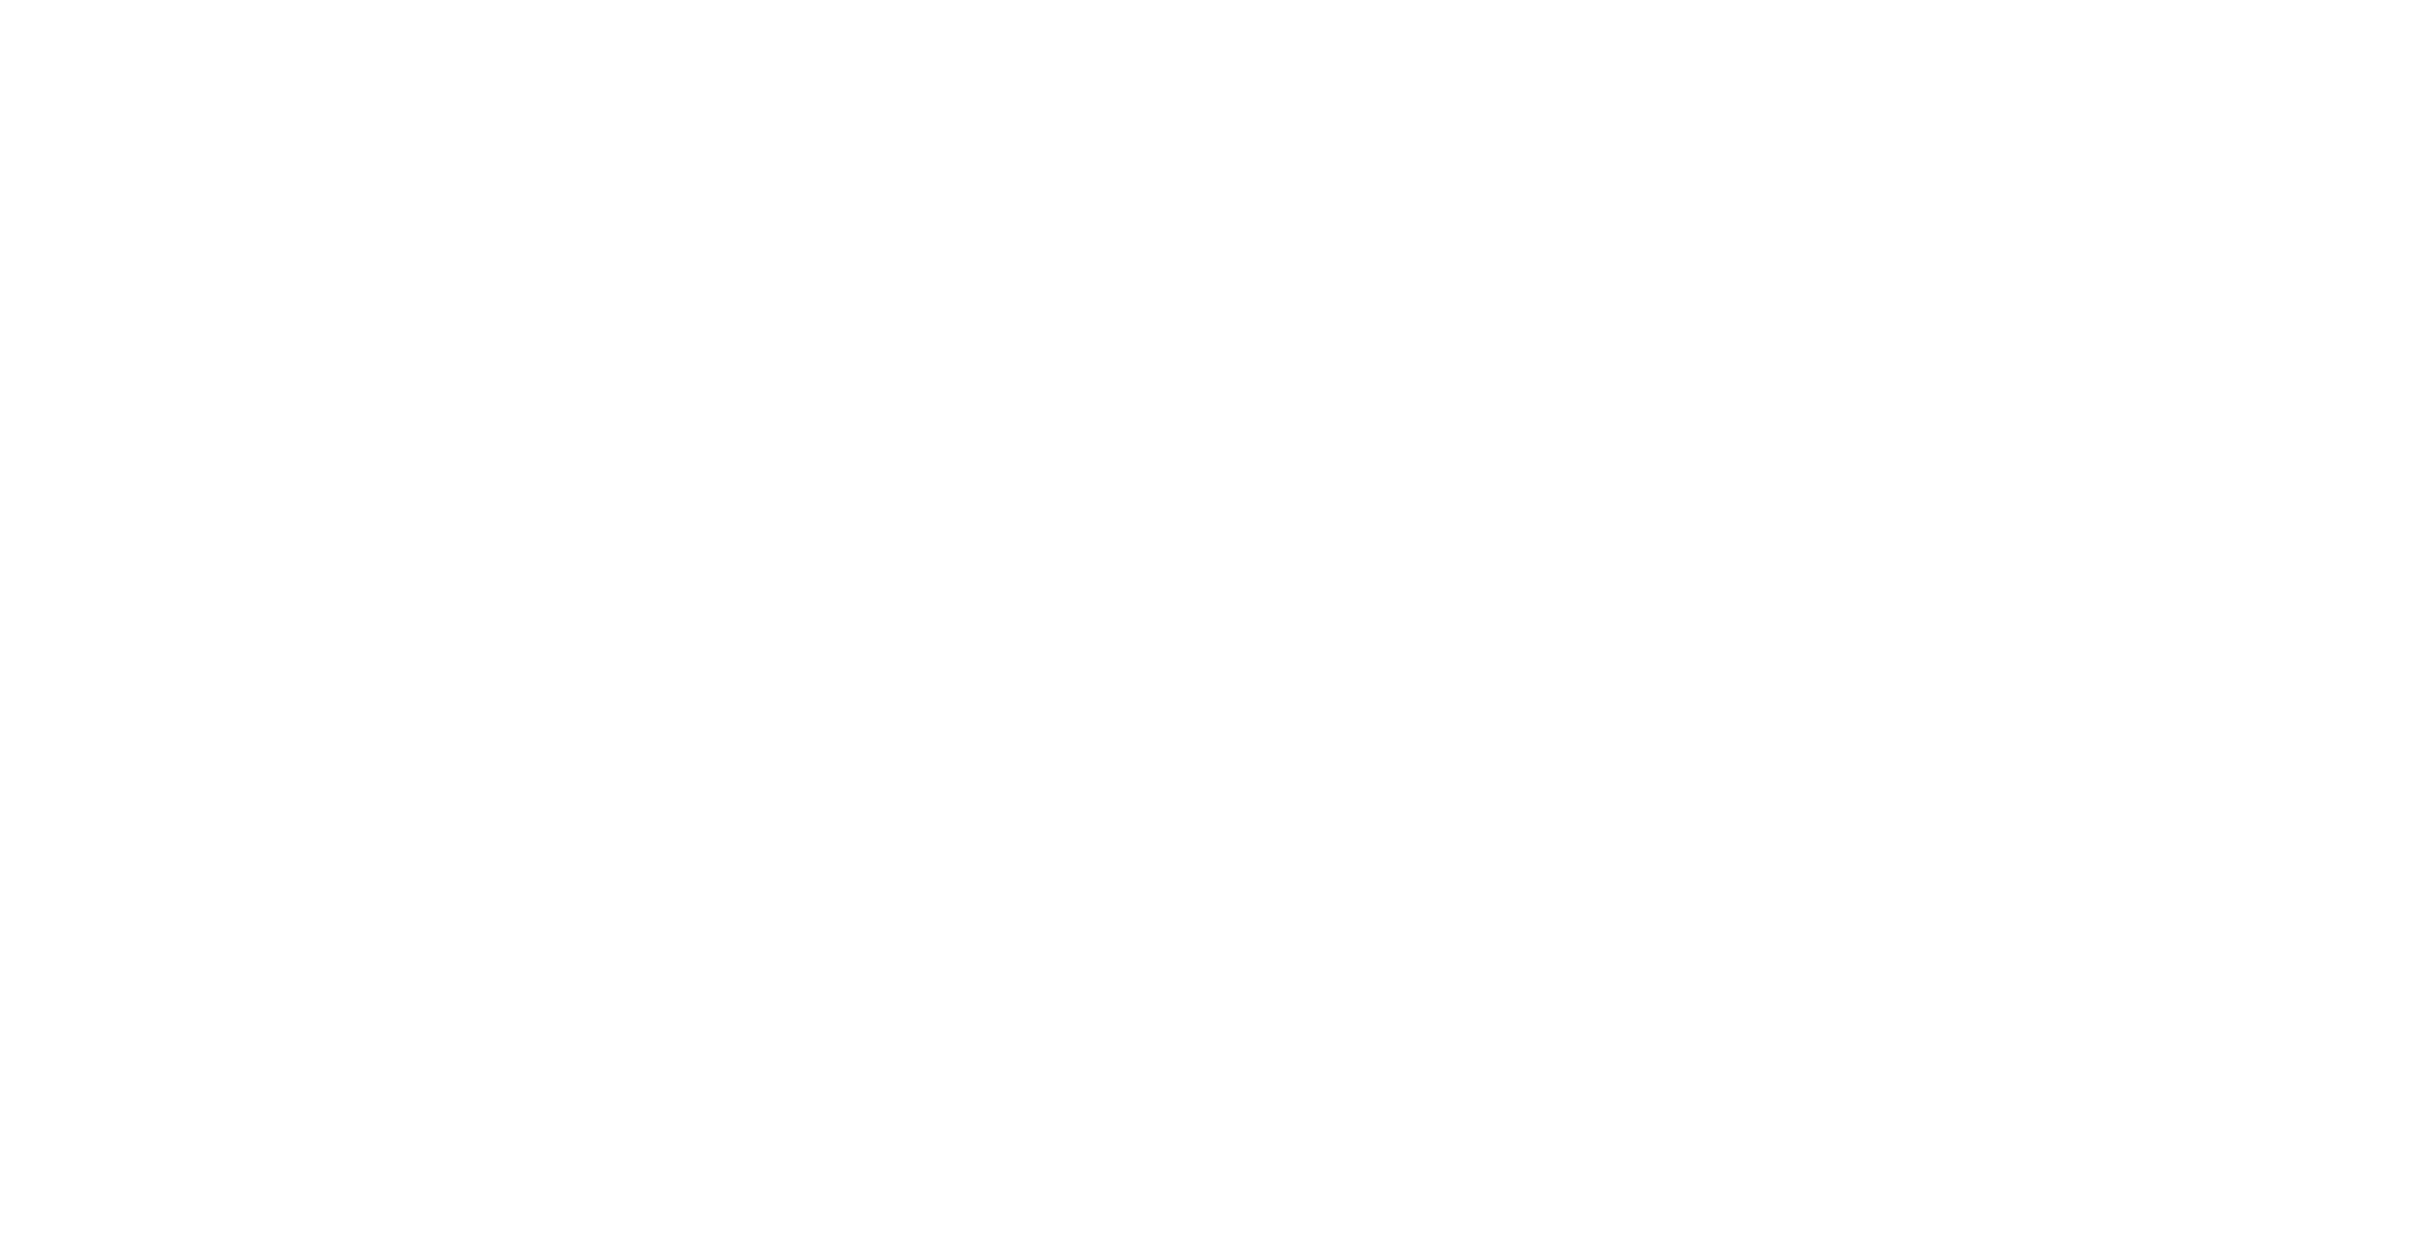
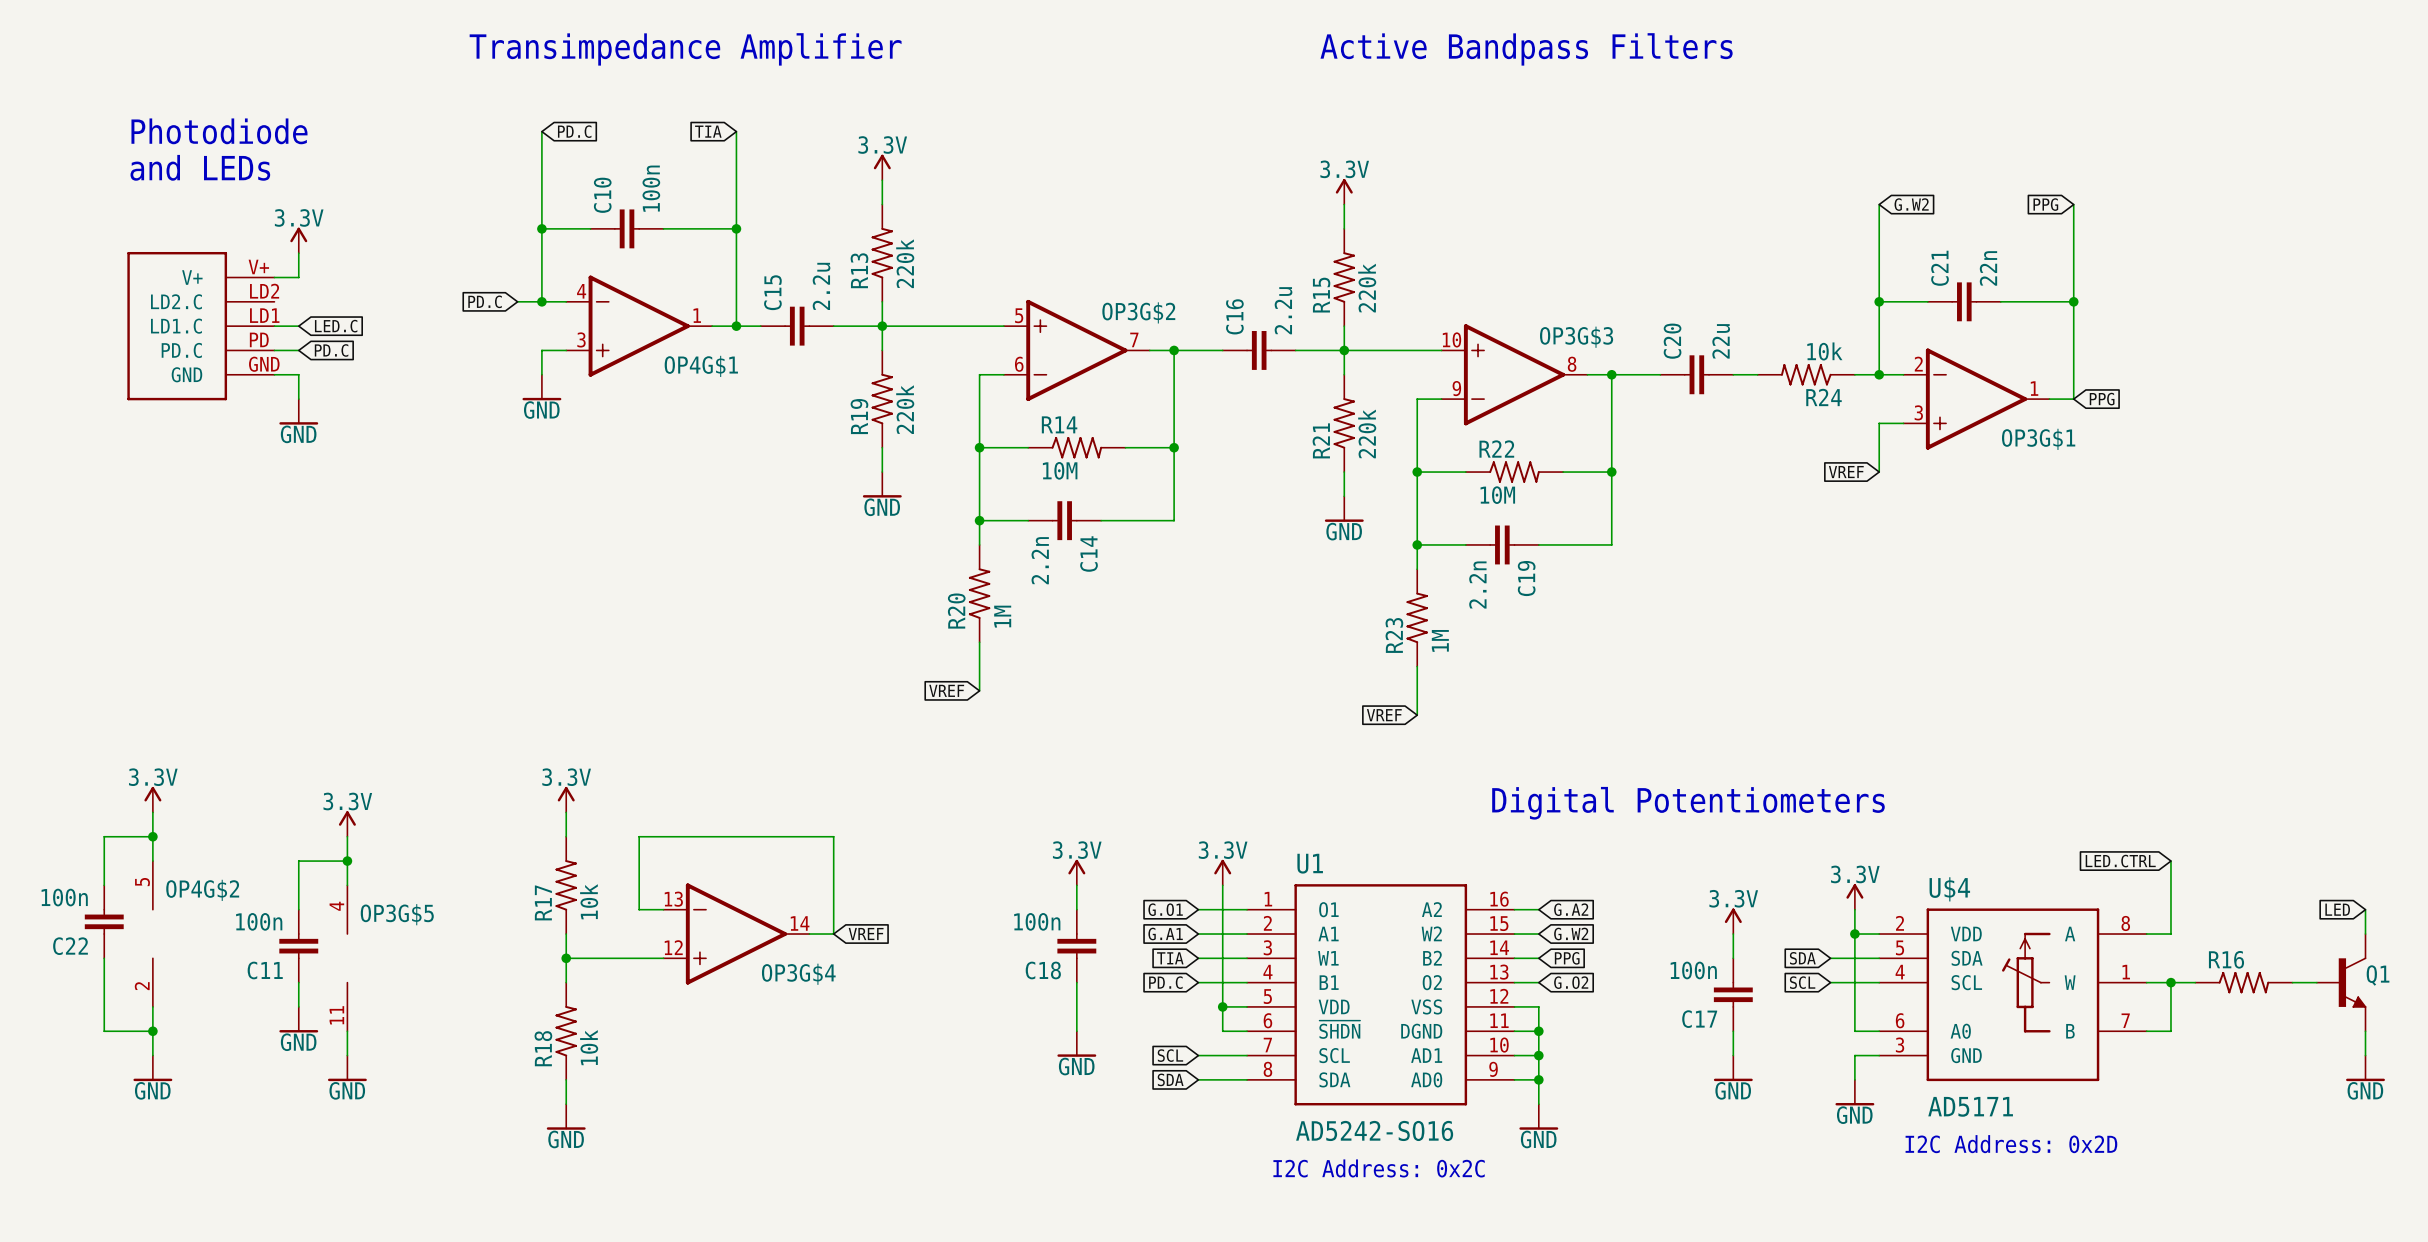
text: none -> Transimpedance Amplifier (685, 49)
text: none -> Active Bandpass Filters (1526, 49)
text: none -> Photodiode (219, 131)
wire: none -> (541, 131) (541, 301)
global label: none -> PD.C (574, 131)
global label: none -> TIA (708, 131)
wire: none -> (736, 131) (736, 326)
power symbol: none -> 3.3V (882, 167)
text: none -> and LEDs (200, 167)
wire: none -> (882, 180) (882, 204)
power symbol: none -> 3.3V (1344, 191)
wire: none -> (1344, 204) (1344, 228)
wire: none -> (1879, 204) (1879, 374)
global label: none -> G.W2 (1911, 204)
global label: none -> PPG (2045, 204)
wire: none -> (2073, 204) (2073, 399) (2049, 399)
wire: none -> (541, 228) (590, 228)
junction: none -> (541, 228)
C10: none -> 100n (627, 228)
wire: none -> (663, 228) (736, 228)
junction: none -> (736, 228)
power symbol: none -> 3.3V (298, 240)
wire: none -> (298, 253) (298, 277) (274, 277)
R13: none -> 220k (882, 253)
R15: none -> 220k (1344, 277)
global label: none -> PD.C (485, 301)
wire: none -> (517, 301) (566, 301)
junction: none -> (541, 301)
wire: none -> (882, 301) (882, 350)
wire: none -> (1879, 301) (1927, 301)
junction: none -> (1879, 301)
C21: none -> 22n (1964, 301)
wire: none -> (2000, 301) (2073, 301)
junction: none -> (2073, 301)
part: none -> (200, 326)
wire: none -> (274, 326) (298, 326)
global label: none -> LED.C (336, 326)
OP4G$1: none -> (639, 326)
wire: none -> (712, 326) (760, 326)
junction: none -> (736, 326)
C15: none -> 2.2u (797, 326)
wire: none -> (833, 326) (1003, 326)
junction: none -> (882, 326)
wire: none -> (1344, 326) (1344, 374)
wire: none -> (274, 350) (298, 350)
global label: none -> PD.C (331, 350)
wire: none -> (566, 350) (541, 350) (541, 374)
OP3G$2: none -> (1076, 350)
wire: none -> (1149, 350) (1222, 350)
wire: none -> (1174, 350) (1174, 520) (1101, 520)
junction: none -> (1174, 350)
C16: none -> 2.2u (1259, 350)
wire: none -> (1295, 350) (1441, 350)
junction: none -> (1344, 350)
wire: none -> (274, 374) (298, 374) (298, 399)
wire: none -> (1003, 374) (979, 374) (979, 544)
OP3G$3: none -> (1514, 374)
wire: none -> (1587, 374) (1660, 374)
wire: none -> (1611, 374) (1611, 544) (1538, 544)
junction: none -> (1611, 374)
C20: none -> 22u (1696, 374)
wire: none -> (1733, 374) (1757, 374)
R24: none -> 10k (1806, 374)
wire: none -> (1854, 374) (1903, 374)
junction: none -> (1879, 374)
power symbol: none -> GND (541, 387)
R19: none -> 220k (882, 399)
wire: none -> (1441, 399) (1417, 399) (1417, 569)
OP3G$1: none -> (1976, 399)
global label: none -> PPG (2102, 399)
power symbol: none -> GND (298, 411)
R21: none -> 220k (1344, 423)
wire: none -> (1903, 423) (1879, 423) (1879, 472)
wire: none -> (882, 447) (882, 472)
wire: none -> (979, 447) (1028, 447)
junction: none -> (979, 447)
R14: none -> 10M (1076, 447)
wire: none -> (1125, 447) (1174, 447)
junction: none -> (1174, 447)
wire: none -> (1344, 472) (1344, 496)
wire: none -> (1417, 472) (1465, 472)
junction: none -> (1417, 472)
R22: none -> 10M (1514, 472)
wire: none -> (1563, 472) (1611, 472)
junction: none -> (1611, 472)
global label: none -> VREF (1846, 472)
power symbol: none -> GND (882, 484)
power symbol: none -> GND (1344, 509)
wire: none -> (979, 520) (1028, 520)
junction: none -> (979, 520)
C14: none -> 2.2n (1064, 520)
wire: none -> (1417, 544) (1465, 544)
junction: none -> (1417, 544)
C19: none -> 2.2n (1502, 544)
R20: none -> 1M (979, 593)
R23: none -> 1M (1417, 617)
wire: none -> (979, 642) (979, 690)
wire: none -> (1417, 666) (1417, 715)
global label: none -> VREF (946, 690)
global label: none -> VREF (1384, 715)
power symbol: none -> 3.3V (152, 799)
power symbol: none -> 3.3V (566, 799)
text: none -> Digital Potentiometers (1688, 803)
wire: none -> (152, 812) (152, 861)
wire: none -> (566, 812) (566, 836)
power symbol: none -> 3.3V (347, 823)
wire: none -> (152, 836) (104, 836) (104, 885)
junction: none -> (152, 836)
wire: none -> (347, 836) (347, 885)
wire: none -> (347, 861) (298, 861) (298, 909)
junction: none -> (347, 861)
global label: none -> LED.CTRL (2120, 861)
wire: none -> (2170, 861) (2170, 934) (2146, 934)
power symbol: none -> 3.3V (1076, 872)
power symbol: none -> 3.3V (1222, 872)
R17: none -> 10k (566, 885)
wire: none -> (1076, 885) (1076, 909)
wire: none -> (1222, 885) (1222, 1031) (1247, 1031)
power symbol: none -> 3.3V (1854, 896)
wire: none -> (663, 909) (639, 909) (639, 836) (833, 836) (833, 934) (809, 934)
global label: none -> G.O1 (1165, 909)
wire: none -> (1198, 909) (1247, 909)
wire: none -> (1514, 909) (1538, 909)
global label: none -> G.A2 (1571, 909)
wire: none -> (1854, 909) (1854, 1031) (1879, 1031)
global label: none -> LED (2337, 909)
wire: none -> (2365, 909) (2365, 934)
C22: none -> 100n (104, 921)
power symbol: none -> 3.3V (1733, 921)
OP4G$2: none -> (152, 934)
wire: none -> (566, 934) (566, 982)
OP3G$4: none -> (736, 934)
global label: none -> VREF (866, 934)
global label: none -> G.A1 (1165, 934)
wire: none -> (1198, 934) (1247, 934)
wire: none -> (1514, 934) (1538, 934)
global label: none -> G.W2 (1571, 934)
wire: none -> (1733, 934) (1733, 958)
wire: none -> (1854, 934) (1879, 934)
junction: none -> (1854, 934)
C11: none -> 100n (298, 946)
C18: none -> 100n (1076, 946)
wire: none -> (104, 958) (104, 1031) (152, 1031)
OP3G$5: none -> (347, 958)
wire: none -> (566, 958) (663, 958)
junction: none -> (566, 958)
global label: none -> TIA (1170, 958)
wire: none -> (1198, 958) (1247, 958)
wire: none -> (1514, 958) (1538, 958)
global label: none -> PPG (1567, 958)
global label: none -> SDA (1802, 958)
wire: none -> (1830, 958) (1879, 958)
wire: none -> (298, 982) (298, 1006)
wire: none -> (1076, 982) (1076, 1031)
global label: none -> PD.C (1165, 982)
wire: none -> (1198, 982) (1247, 982)
wire: none -> (1514, 982) (1538, 982)
global label: none -> G.O2 (1571, 982)
global label: none -> SCL (1802, 982)
wire: none -> (1830, 982) (1879, 982)
wire: none -> (2146, 982) (2195, 982)
wire: none -> (2170, 982) (2170, 1031) (2146, 1031)
junction: none -> (2170, 982)
R16: none -> (2243, 982)
wire: none -> (2292, 982) (2316, 982)
Q1: none -> (2341, 982)
U1: none -> AD5242-SO16 (1380, 994)
C17: none -> 100n (1733, 994)
U$4: none -> AD5171 (2012, 994)
wire: none -> (152, 1006) (152, 1055)
wire: none -> (1222, 1006) (1247, 1006)
junction: none -> (1222, 1006)
wire: none -> (1514, 1006) (1538, 1006) (1538, 1104)
power symbol: none -> GND (298, 1019)
junction: none -> (152, 1031)
wire: none -> (347, 1031) (347, 1055)
R18: none -> 10k (566, 1031)
wire: none -> (1514, 1031) (1538, 1031)
junction: none -> (1538, 1031)
wire: none -> (1733, 1031) (1733, 1055)
wire: none -> (2365, 1031) (2365, 1055)
power symbol: none -> GND (1076, 1044)
global label: none -> SCL (1170, 1055)
wire: none -> (1198, 1055) (1247, 1055)
wire: none -> (1514, 1055) (1538, 1055)
junction: none -> (1538, 1055)
wire: none -> (1879, 1055) (1854, 1055) (1854, 1079)
power symbol: none -> GND (152, 1068)
power symbol: none -> GND (347, 1068)
power symbol: none -> GND (1733, 1068)
power symbol: none -> GND (2365, 1068)
wire: none -> (566, 1079) (566, 1104)
global label: none -> SDA (1170, 1079)
wire: none -> (1198, 1079) (1247, 1079)
wire: none -> (1514, 1079) (1538, 1079)
junction: none -> (1538, 1079)
power symbol: none -> GND (1854, 1092)
power symbol: none -> GND (566, 1116)
power symbol: none -> GND (1538, 1116)
text: none -> I2C Address: 0x2D (2011, 1144)
text: none -> I2C Address: 0x2C (1379, 1168)

